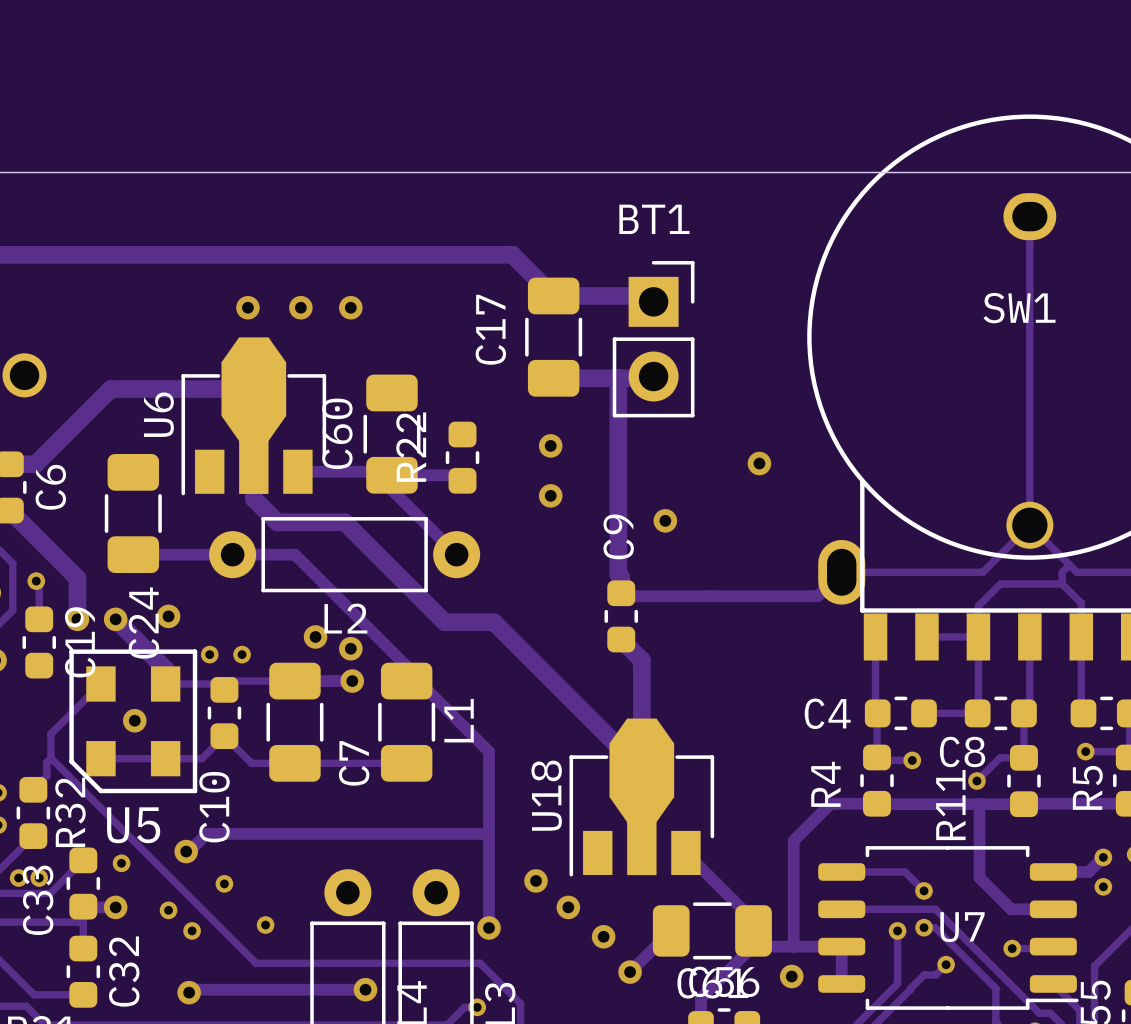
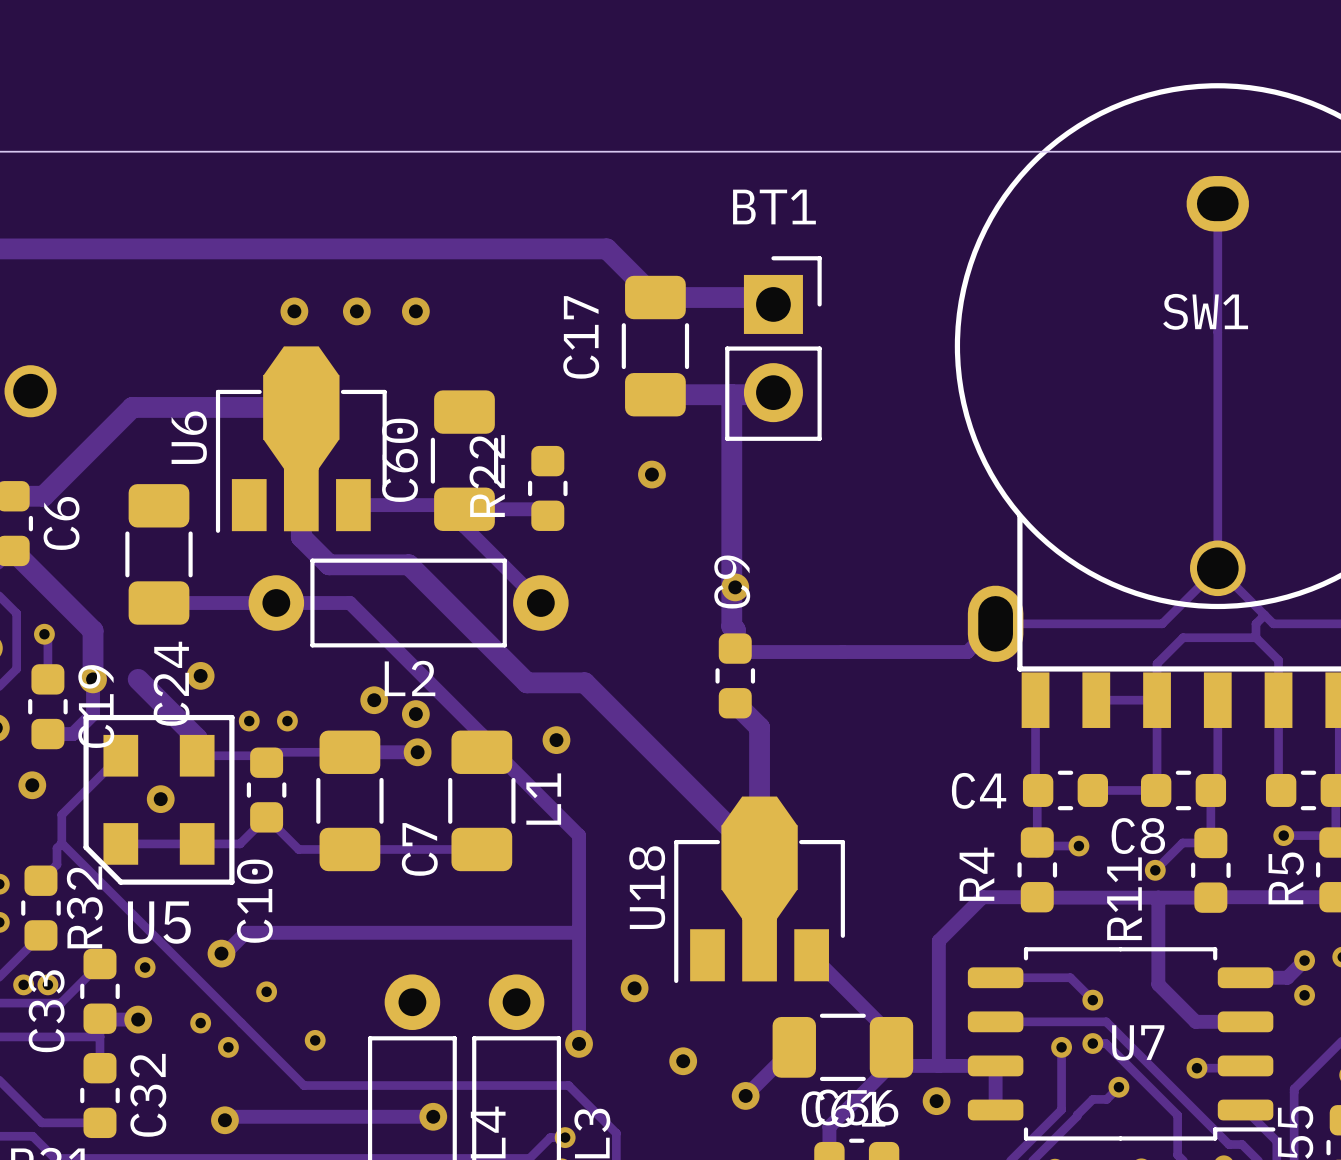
via: (759, 463) -> none
via: (550, 495) -> none
via: (665, 520) -> none
via: none -> (735, 587)
track: none -> (93, 679) (93, 714) (73, 734) (47, 734)
via position: (115, 619) -> (32, 785)
via: none -> (556, 740)
via: (568, 907) -> none
via: (603, 936) -> none
via: none -> (683, 1061)

